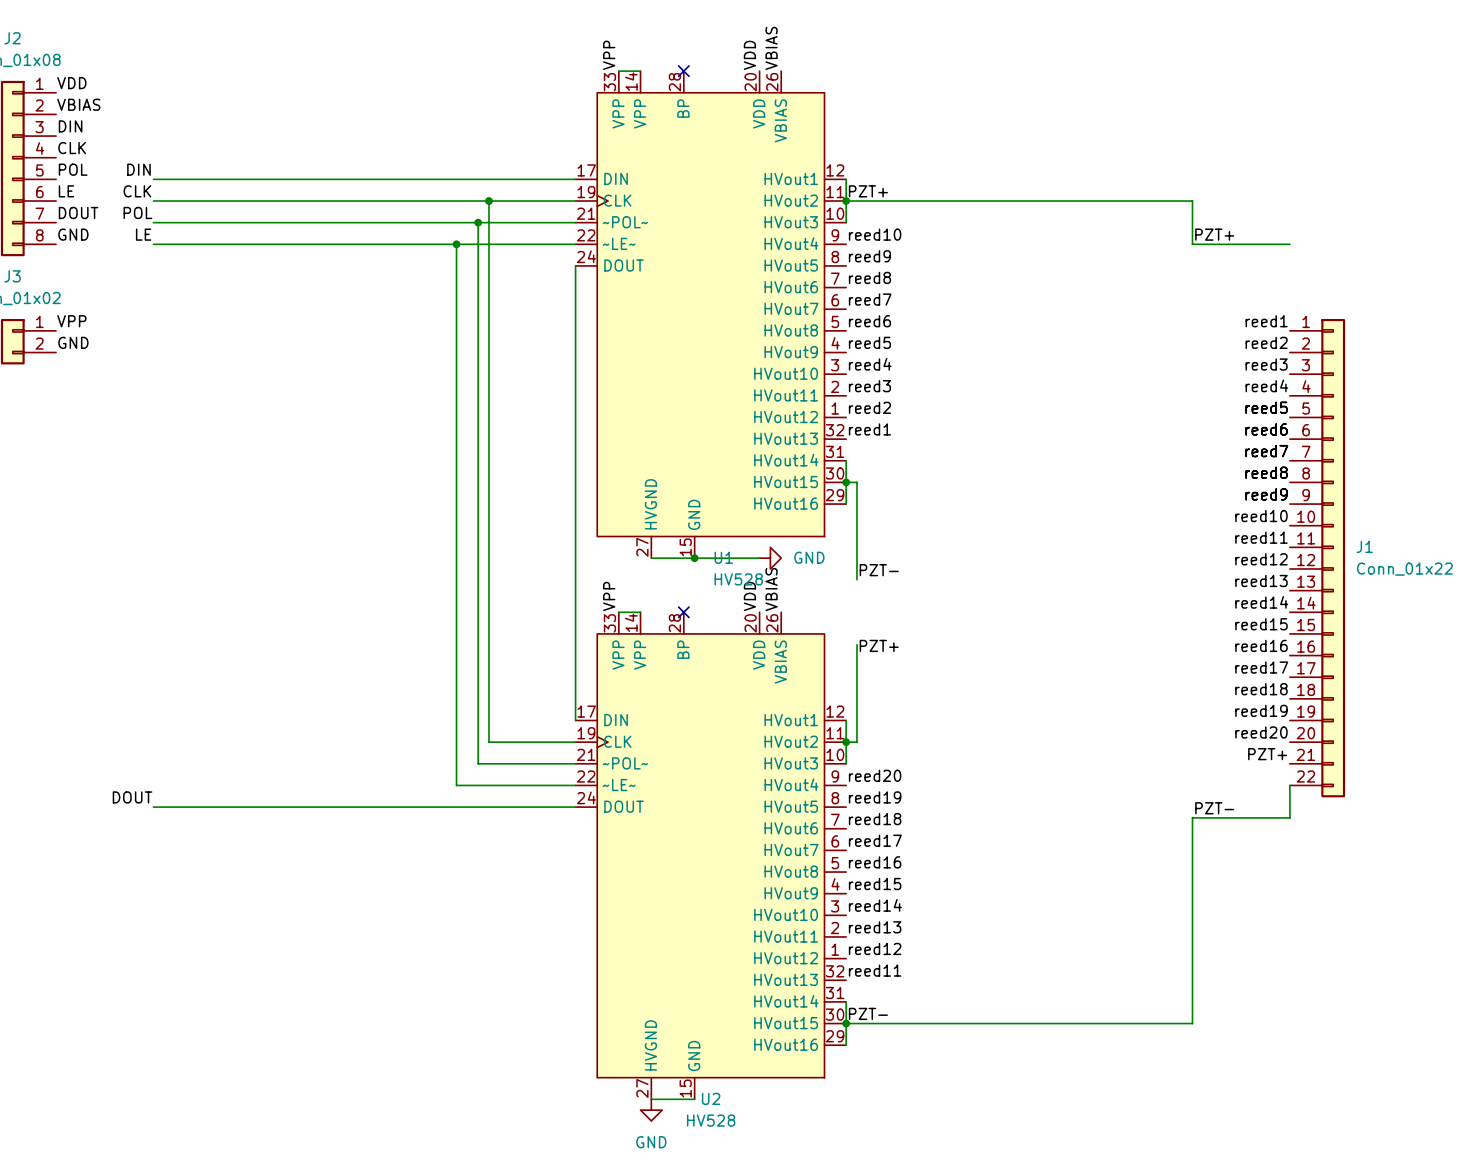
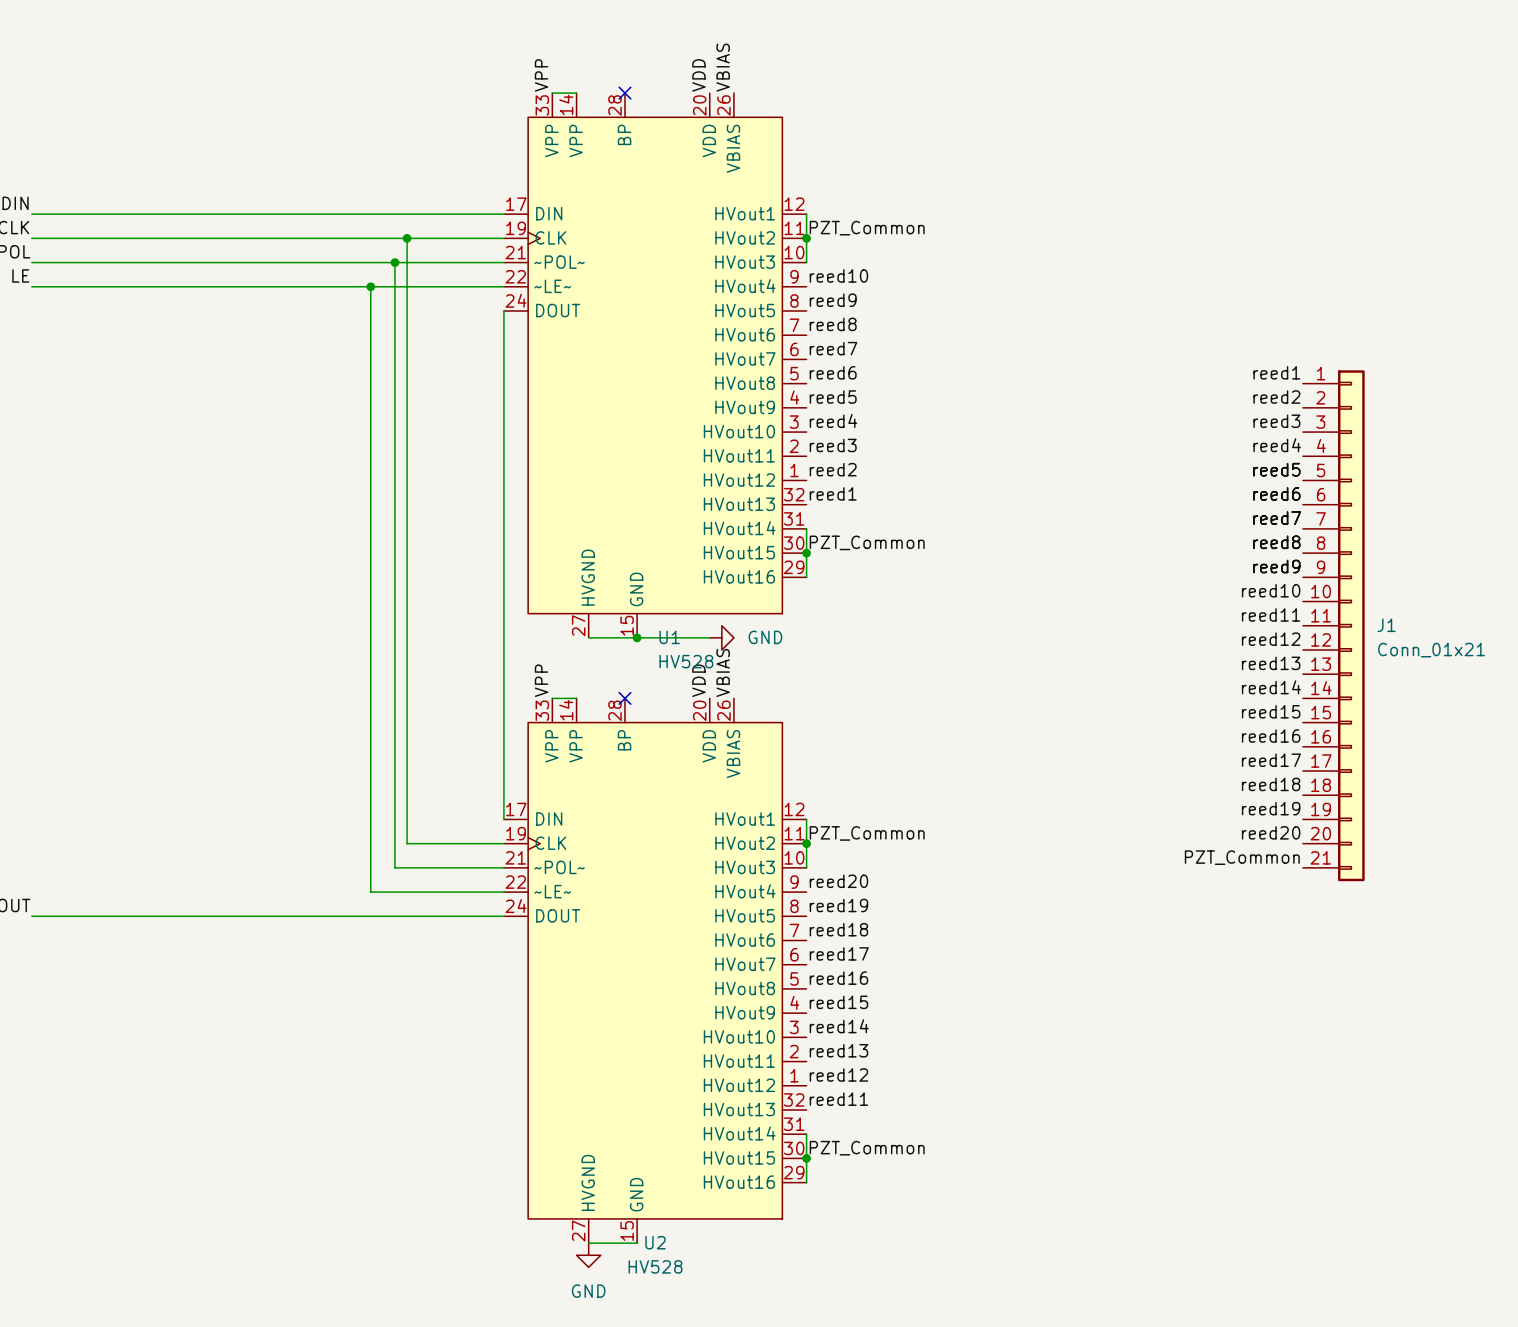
label: PZT+ (868, 191) -> PZT_Common (867, 228)
wire: (846, 201) (1192, 201) (1192, 244) (1289, 244) -> none
label: PZT+ (1214, 234) -> none
J1 symbol: [1289, 318, 1346, 798] -> [1302, 370, 1365, 882]
label: none -> PZT_Common (867, 542)
wire: (846, 482) (856, 482) (856, 579) -> none
J1 value: Conn_01x22 (1404, 569) -> Conn_01x21 (1431, 650)
label: PZT- (879, 570) -> none
wire: (856, 644) (856, 742) (846, 742) -> none
label: PZT+ (879, 645) -> none
label: none -> PZT_Common (867, 833)
label: PZT+ (1267, 754) -> PZT_Common (1242, 857)
wire: (1289, 785) (1289, 817) (1192, 817) (1192, 1023) (846, 1023) -> none
label: PZT- (1214, 808) -> none
label: PZT- (868, 1013) -> PZT_Common (867, 1148)

